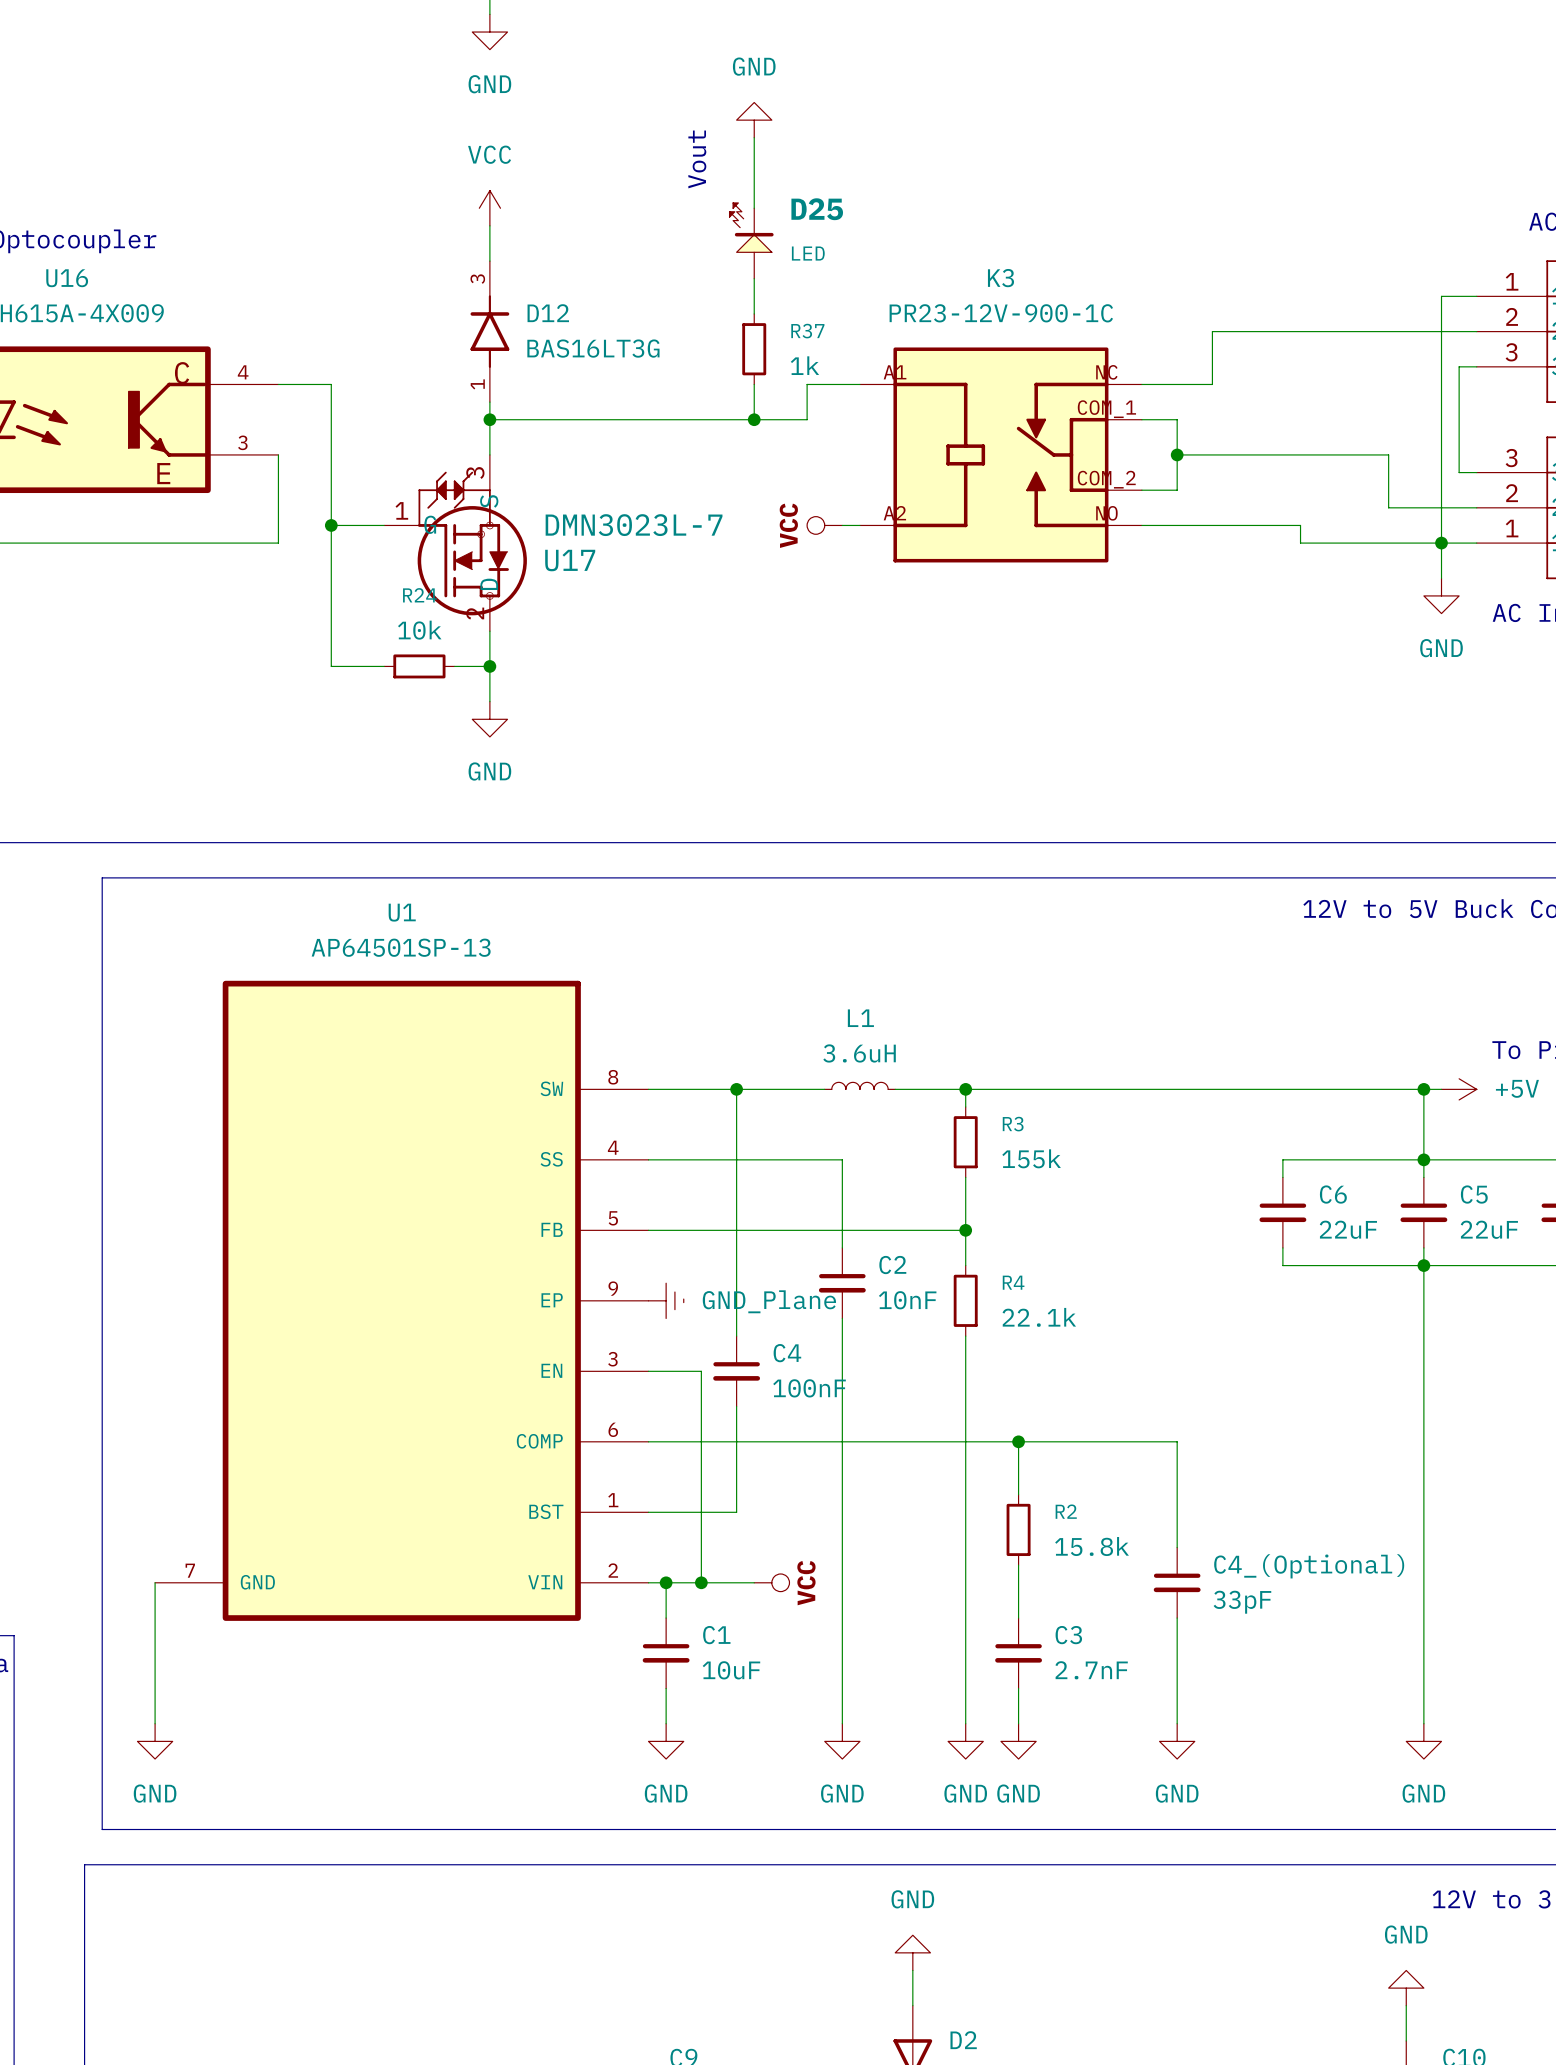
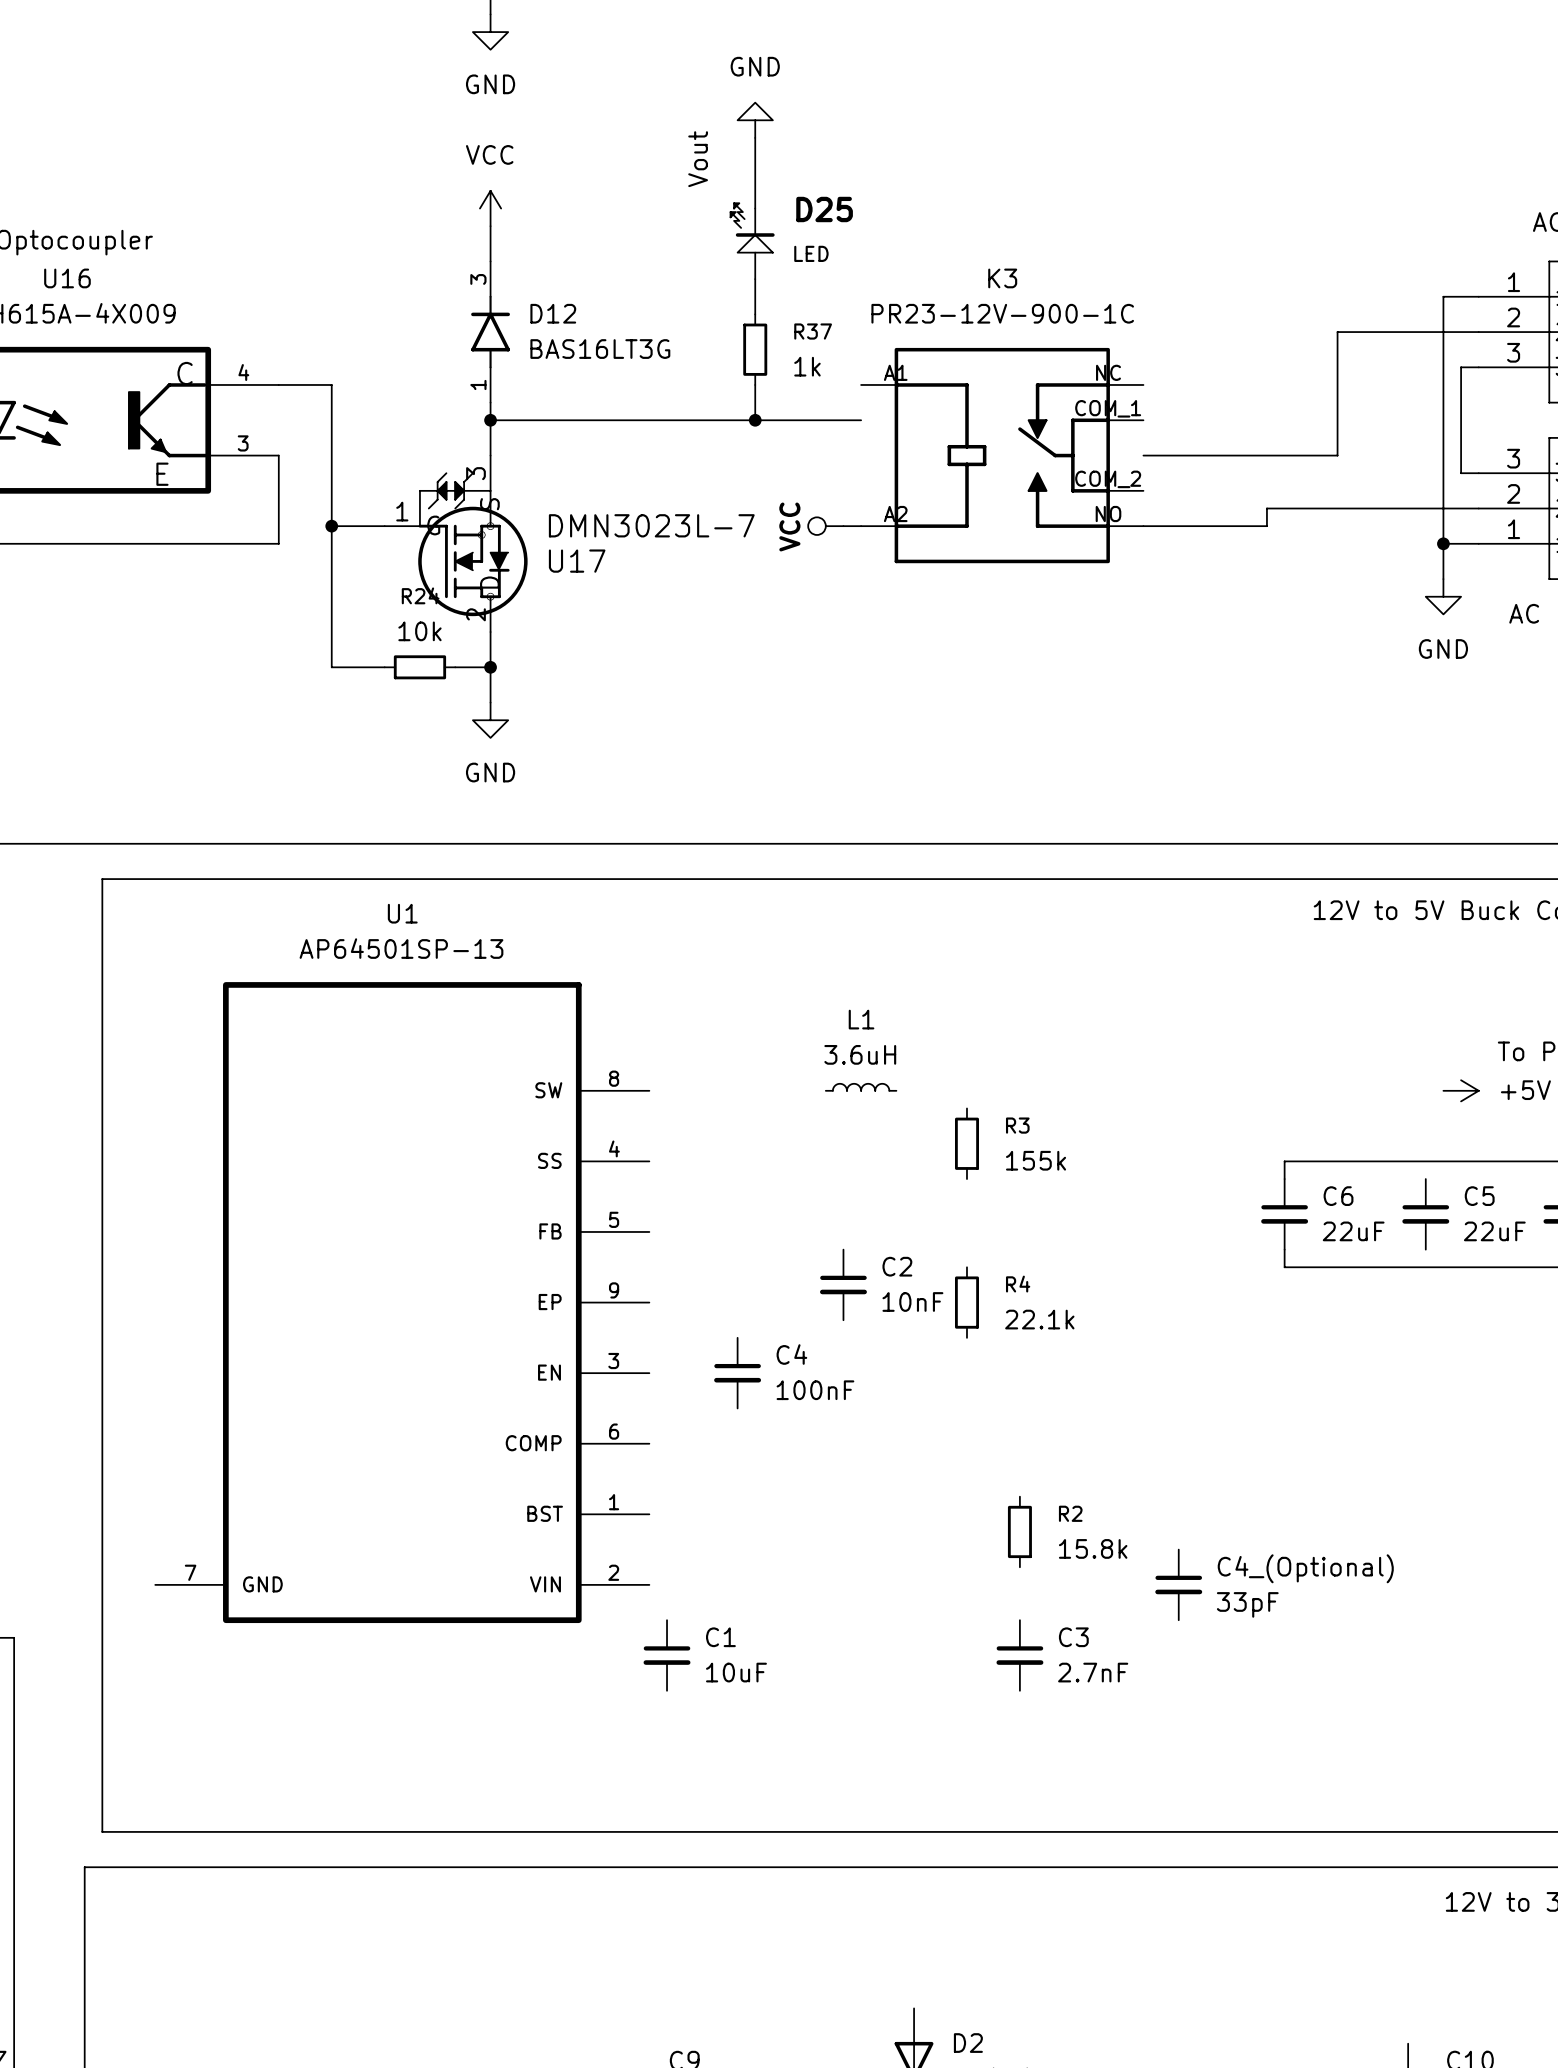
wire: (1335, 331) (1212, 331) (1212, 384) (1141, 384) -> none
wire: (859, 384) (807, 384) (807, 419) -> (861, 420) (808, 420)
wire: (1141, 419) (1177, 419) (1177, 490) (1141, 490) -> none
wire: none -> (1143, 455) (1178, 455)
junction: (1177, 454) -> none
wire: (1335, 454) (1388, 454) (1388, 507) -> (1337, 455) (1337, 332)
wire: (1265, 525) (1300, 525) (1300, 543) (1441, 543) -> (1266, 526) (1266, 508) (1390, 508)
wire: (648, 1089) (824, 1089) -> none
wire: (736, 1089) (736, 1336) -> none
junction: (736, 1089) -> none
wire: (895, 1089) (1441, 1089) -> none
wire: (965, 1089) (965, 1106) -> none
junction: (965, 1089) -> none
wire: (1423, 1089) (1423, 1177) -> none
junction: (1423, 1089) -> none
wire: (648, 1159) (842, 1159) (842, 1247) -> none
junction: (1423, 1159) -> none
wire: (965, 1177) (965, 1265) -> none
wire: (648, 1230) (965, 1230) -> none
junction: (965, 1230) -> none
wire: (1423, 1247) (1423, 1723) -> none
junction: (1423, 1265) -> none
power symbol: GND_Plane (666, 1300) -> none
wire: (842, 1318) (842, 1723) -> none
wire: (965, 1336) (965, 1723) -> none
wire: (648, 1371) (701, 1371) (701, 1582) -> none
wire: (736, 1406) (736, 1512) (648, 1512) -> none
wire: (648, 1441) (1177, 1441) (1177, 1547) -> none
wire: (1018, 1441) (1018, 1494) -> none
junction: (1018, 1441) -> none
wire: (1018, 1565) (1018, 1618) -> none
wire: (155, 1582) (155, 1723) -> none
wire: (648, 1582) (754, 1582) -> none
wire: (666, 1582) (666, 1618) -> none
junction: (666, 1582) -> none
junction: (701, 1582) -> none
power symbol: (771, 1582) -> none
wire: (1177, 1618) (1177, 1723) -> none
wire: (666, 1688) (666, 1723) -> none
wire: (1018, 1688) (1018, 1723) -> none
power symbol: GND (155, 1741) -> none
power symbol: GND (666, 1741) -> none
power symbol: GND (842, 1741) -> none
power symbol: GND (965, 1741) -> none
power symbol: GND (1018, 1741) -> none
power symbol: GND (1177, 1741) -> none
power symbol: GND (1423, 1741) -> none
power symbol: GND (912, 1952) -> none
wire: (912, 1970) (912, 2005) -> none
power symbol: GND (1406, 1988) -> none
wire: (1406, 2005) (1406, 2040) -> none

